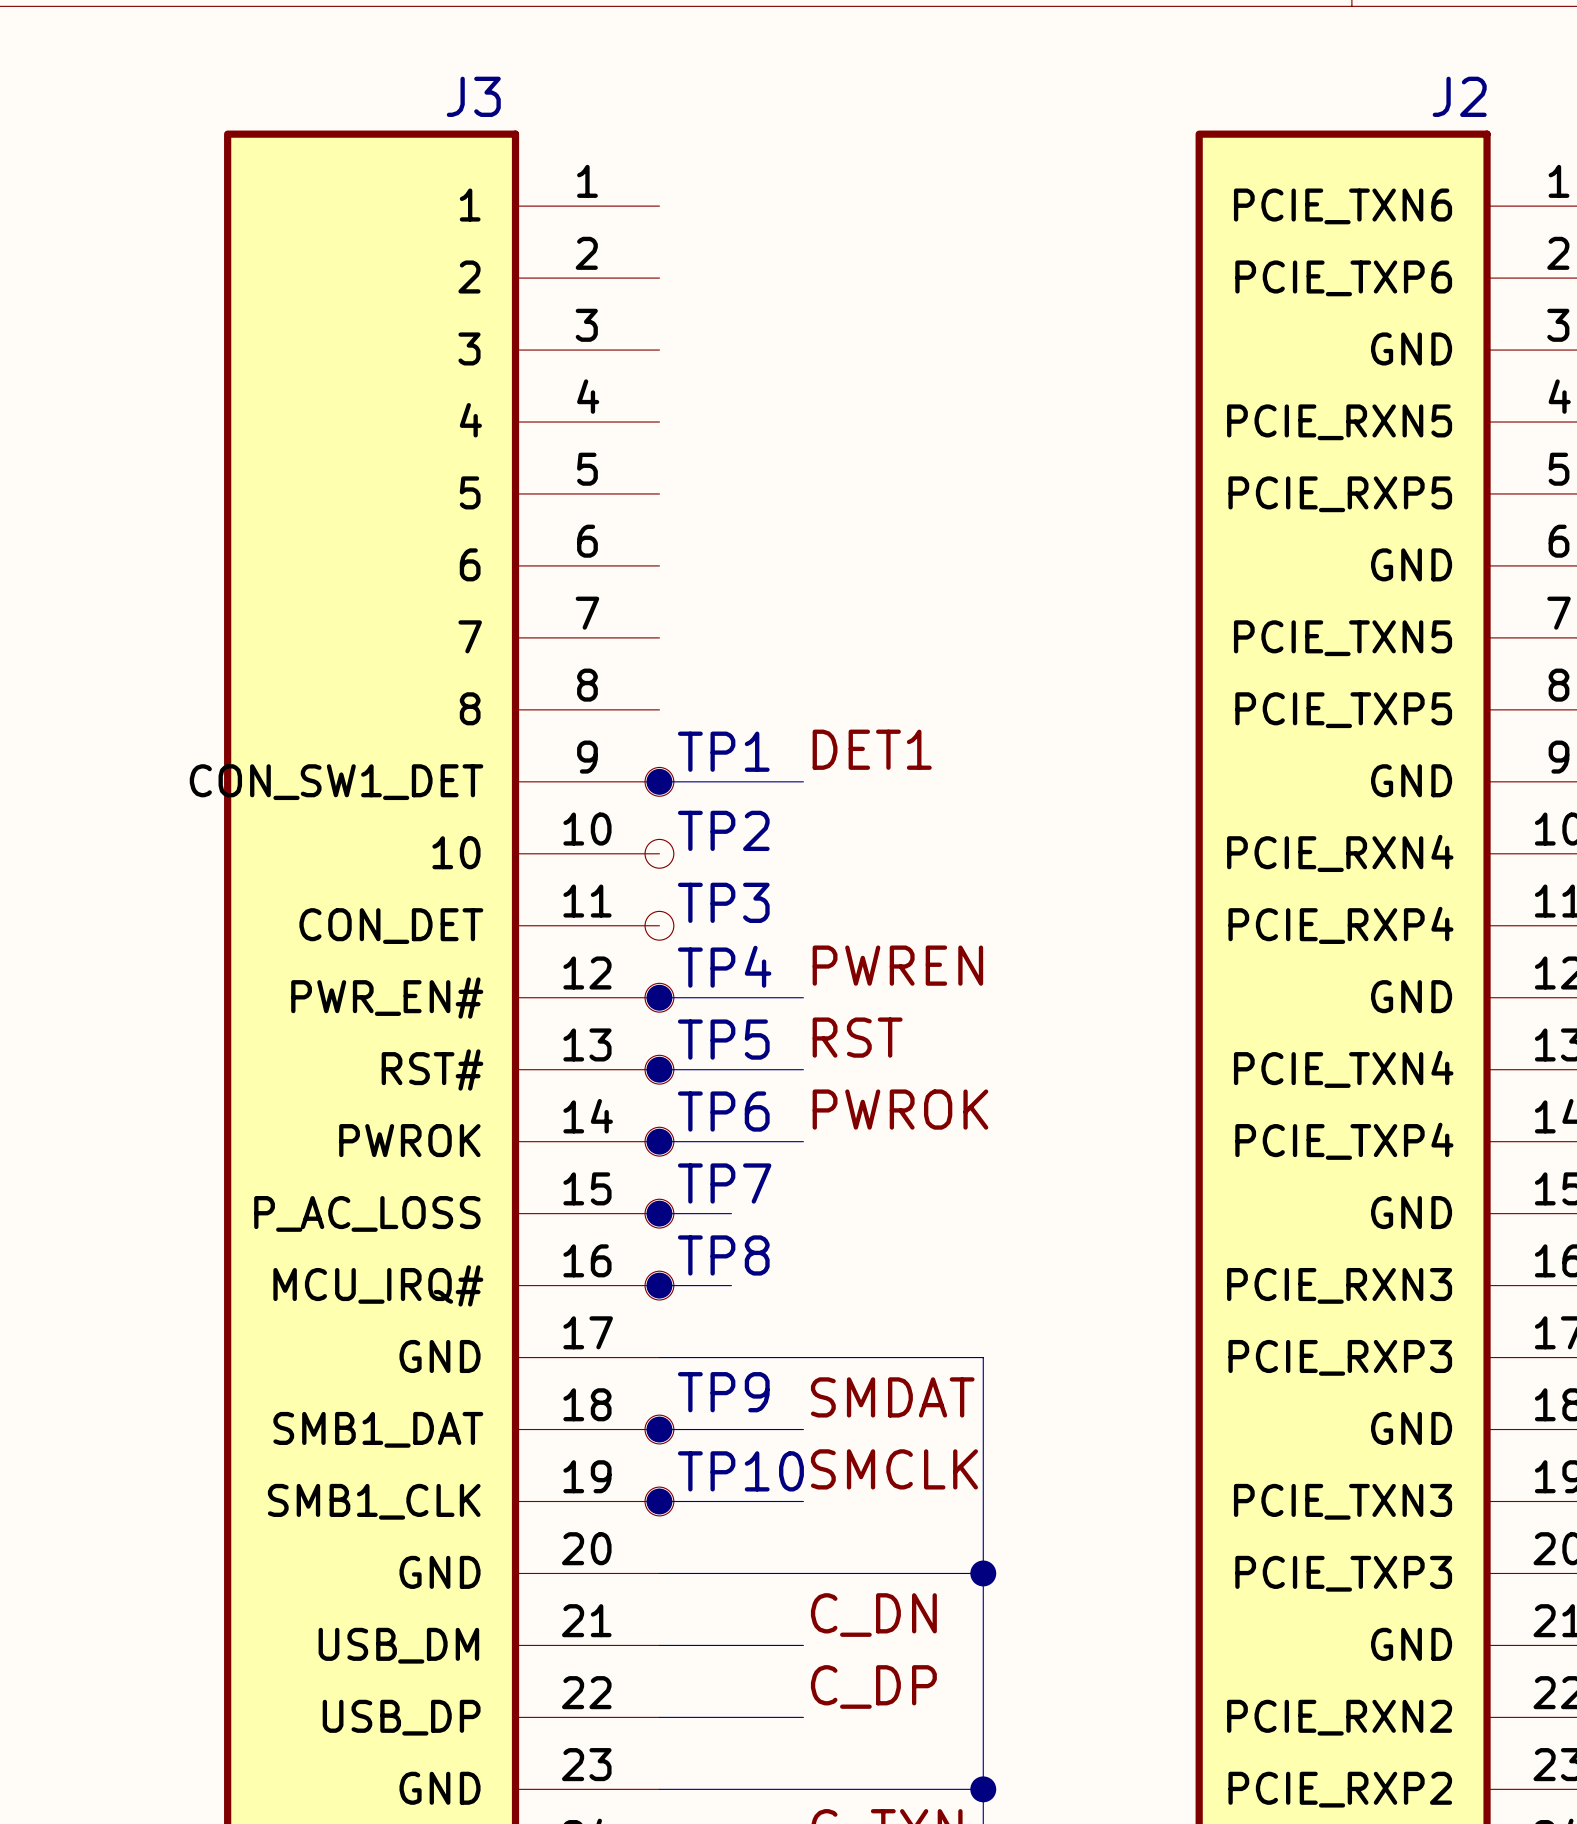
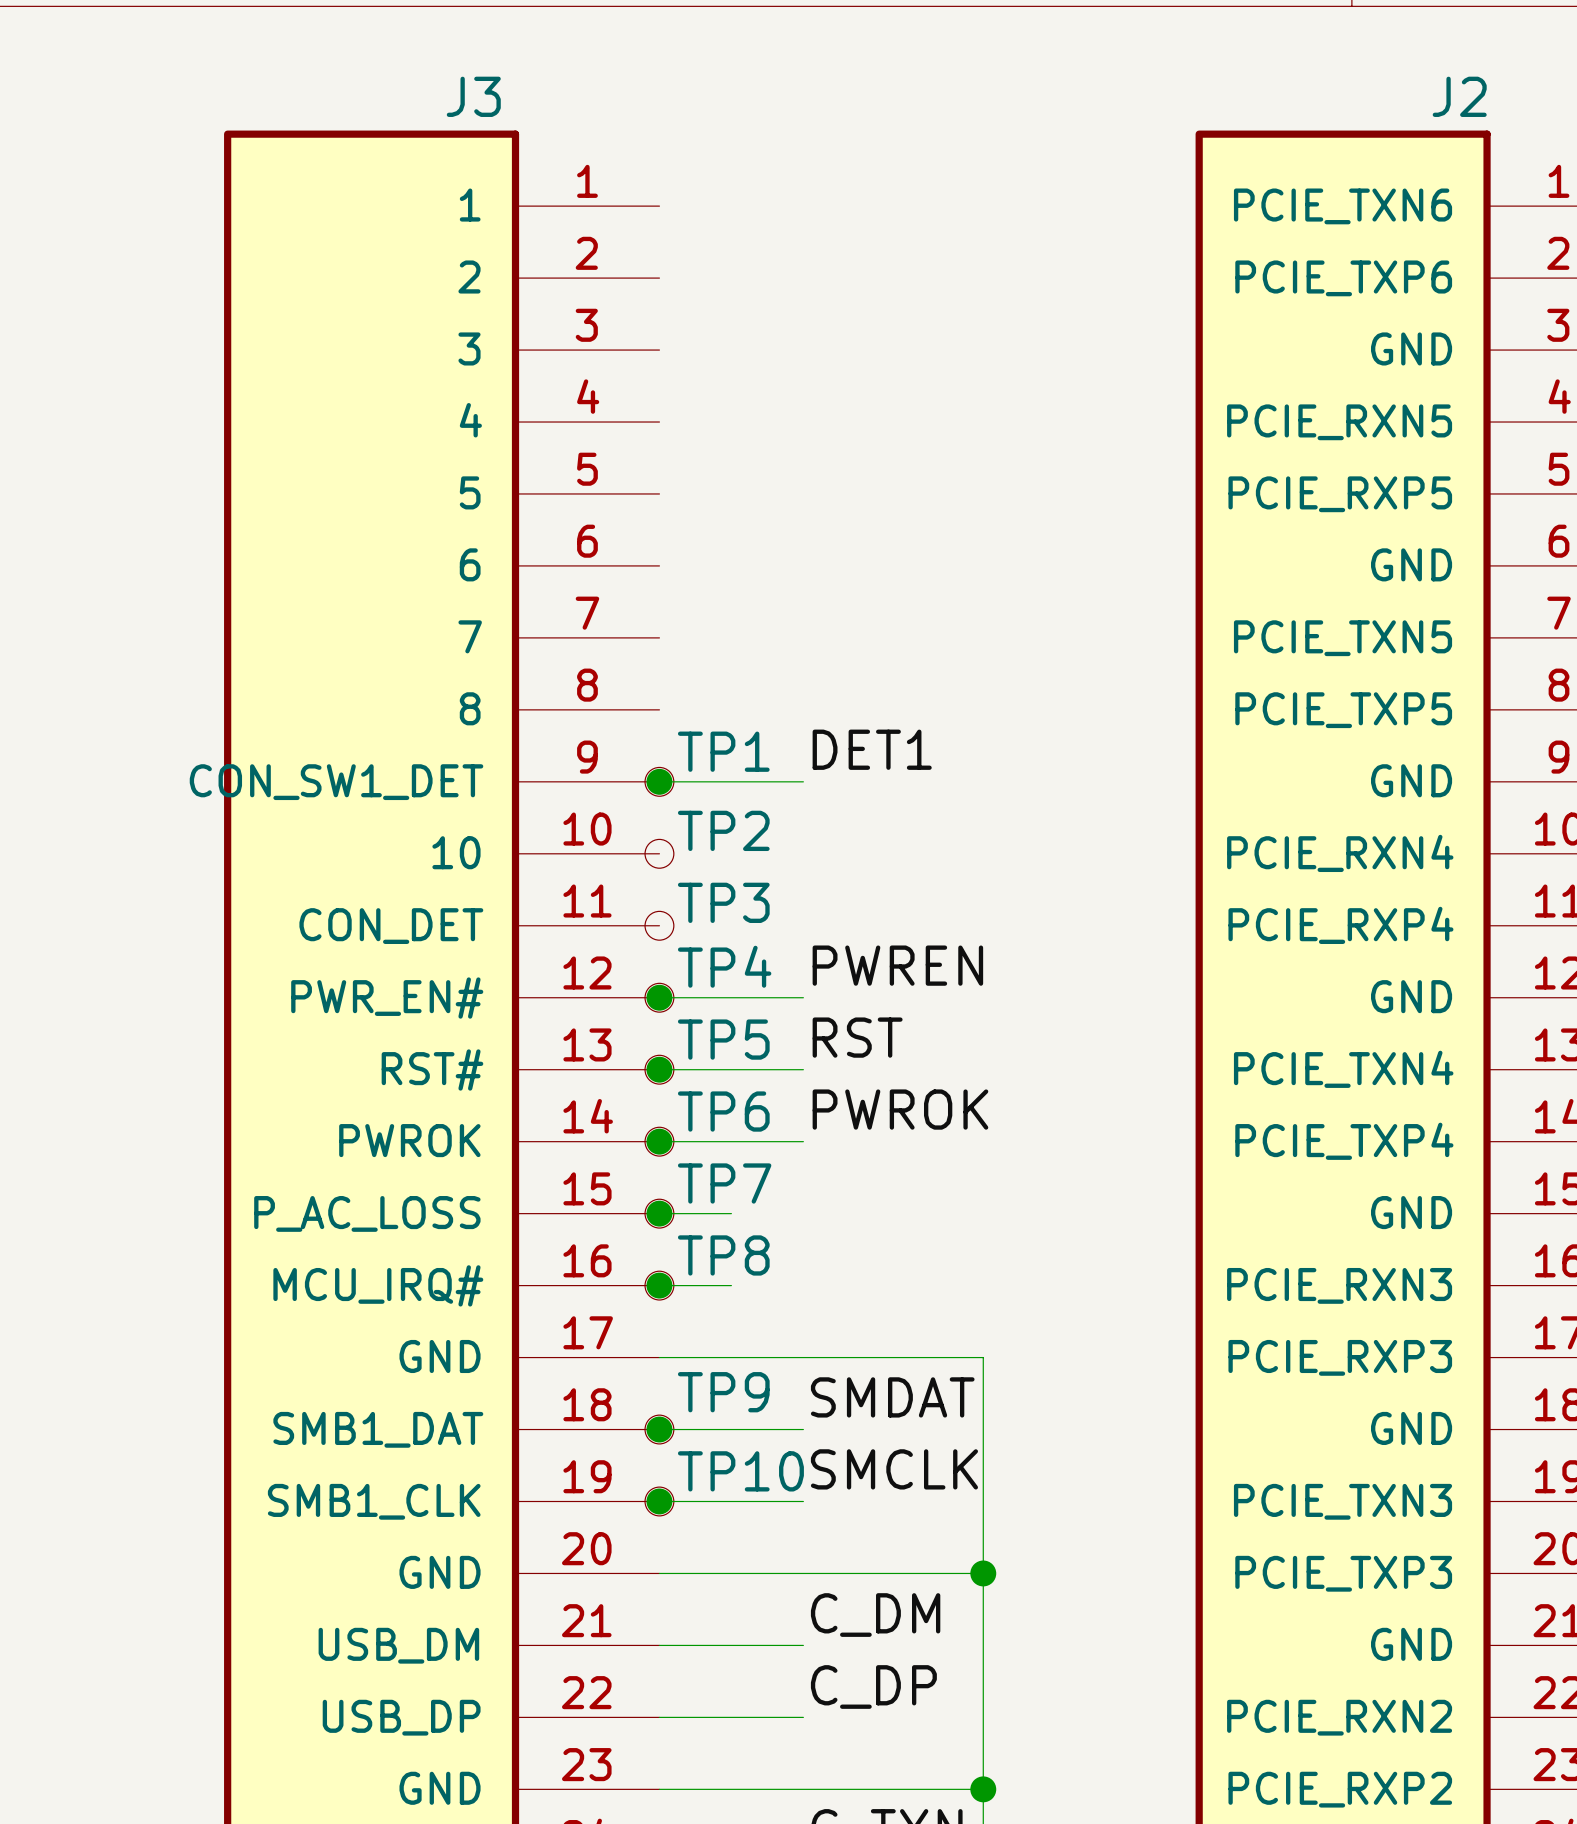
label: C_DN (873, 1615) -> C_DM (875, 1615)

